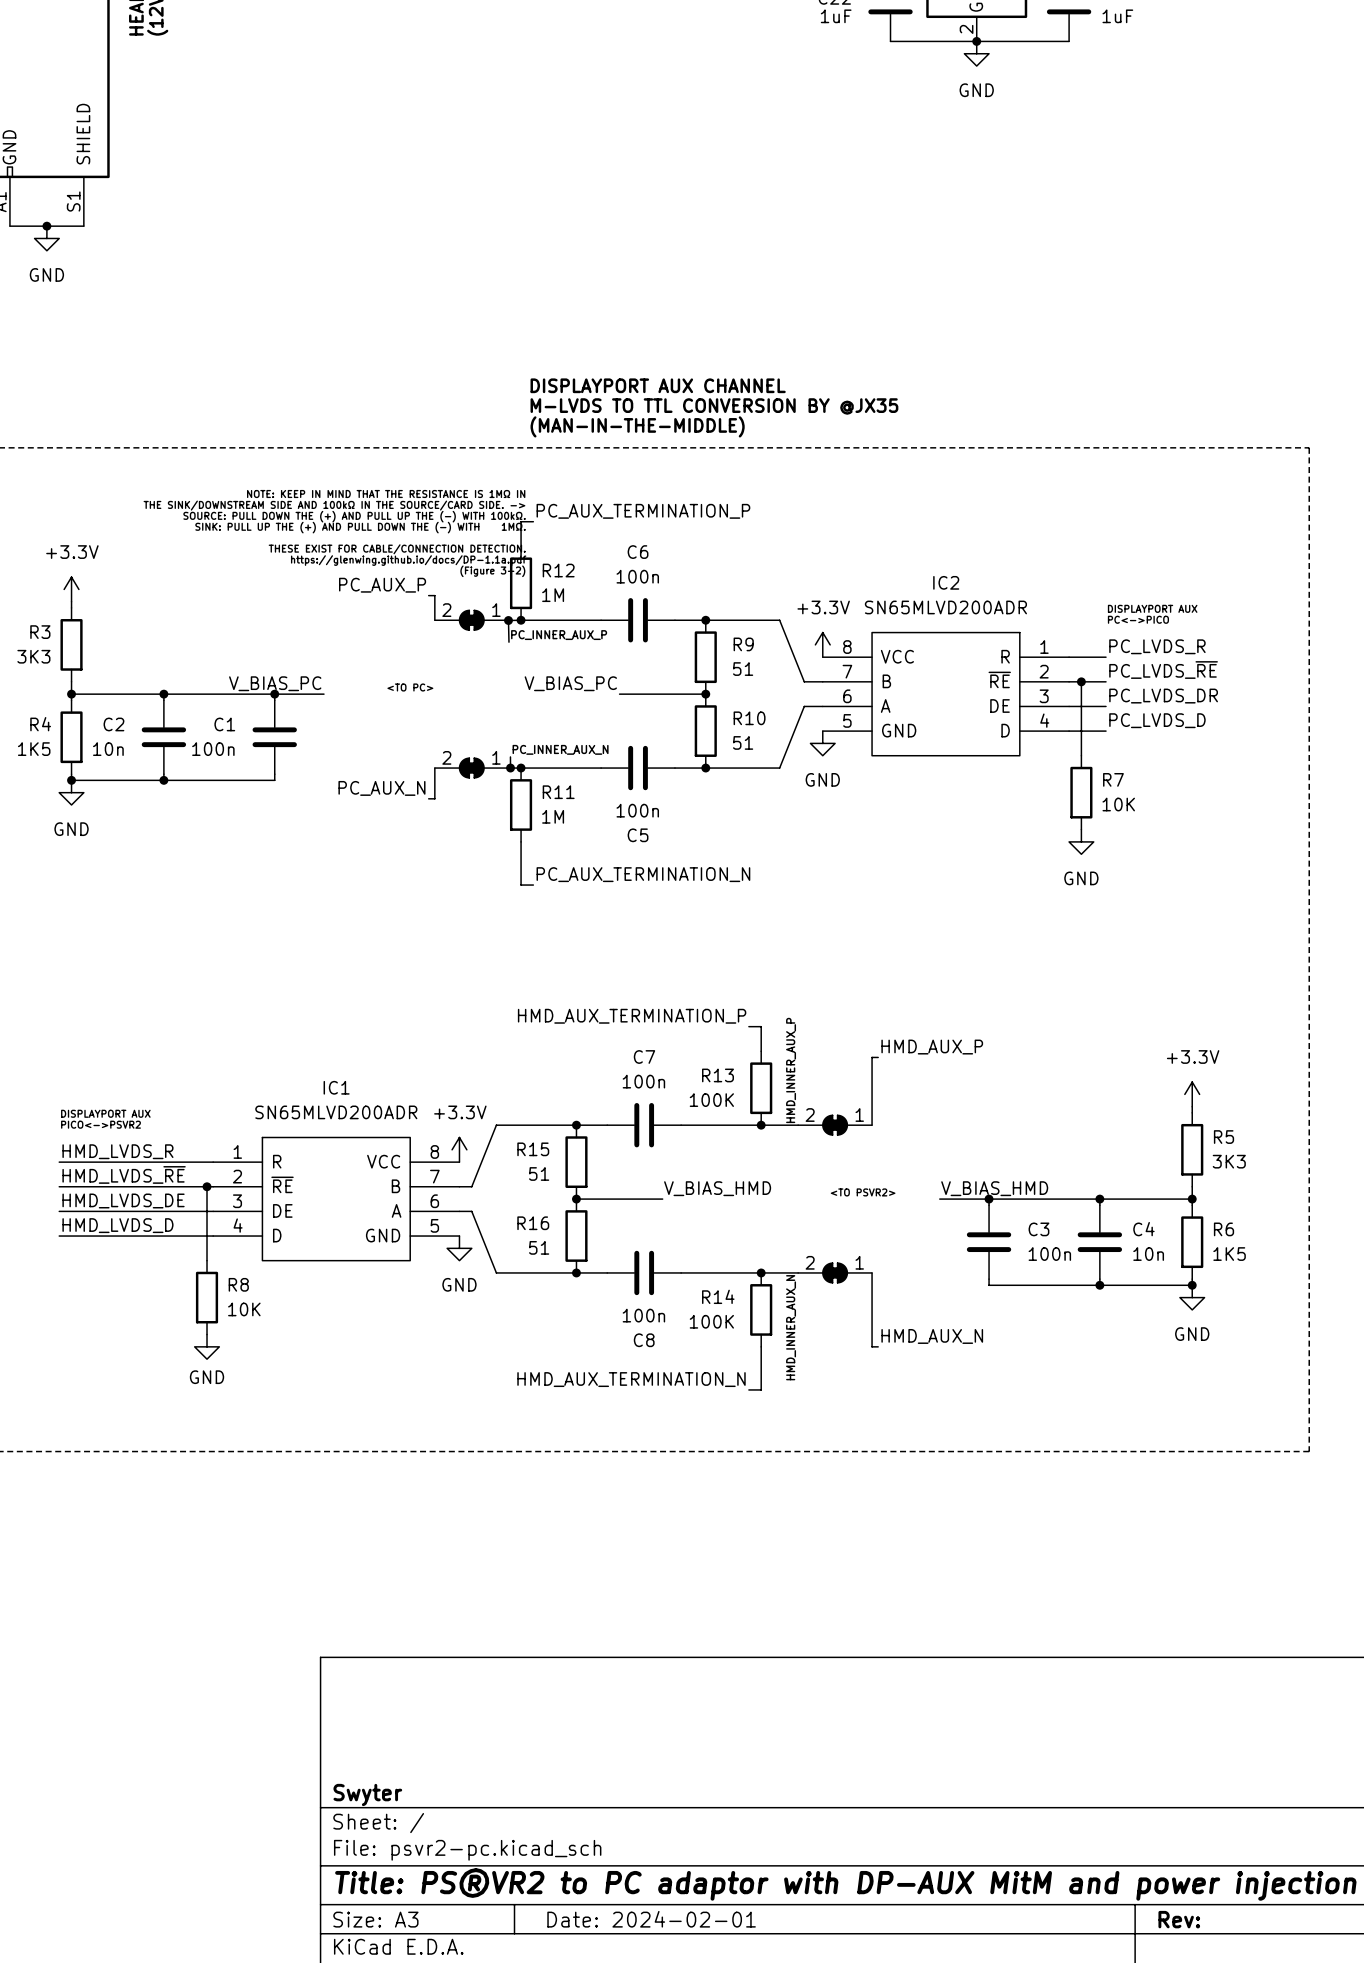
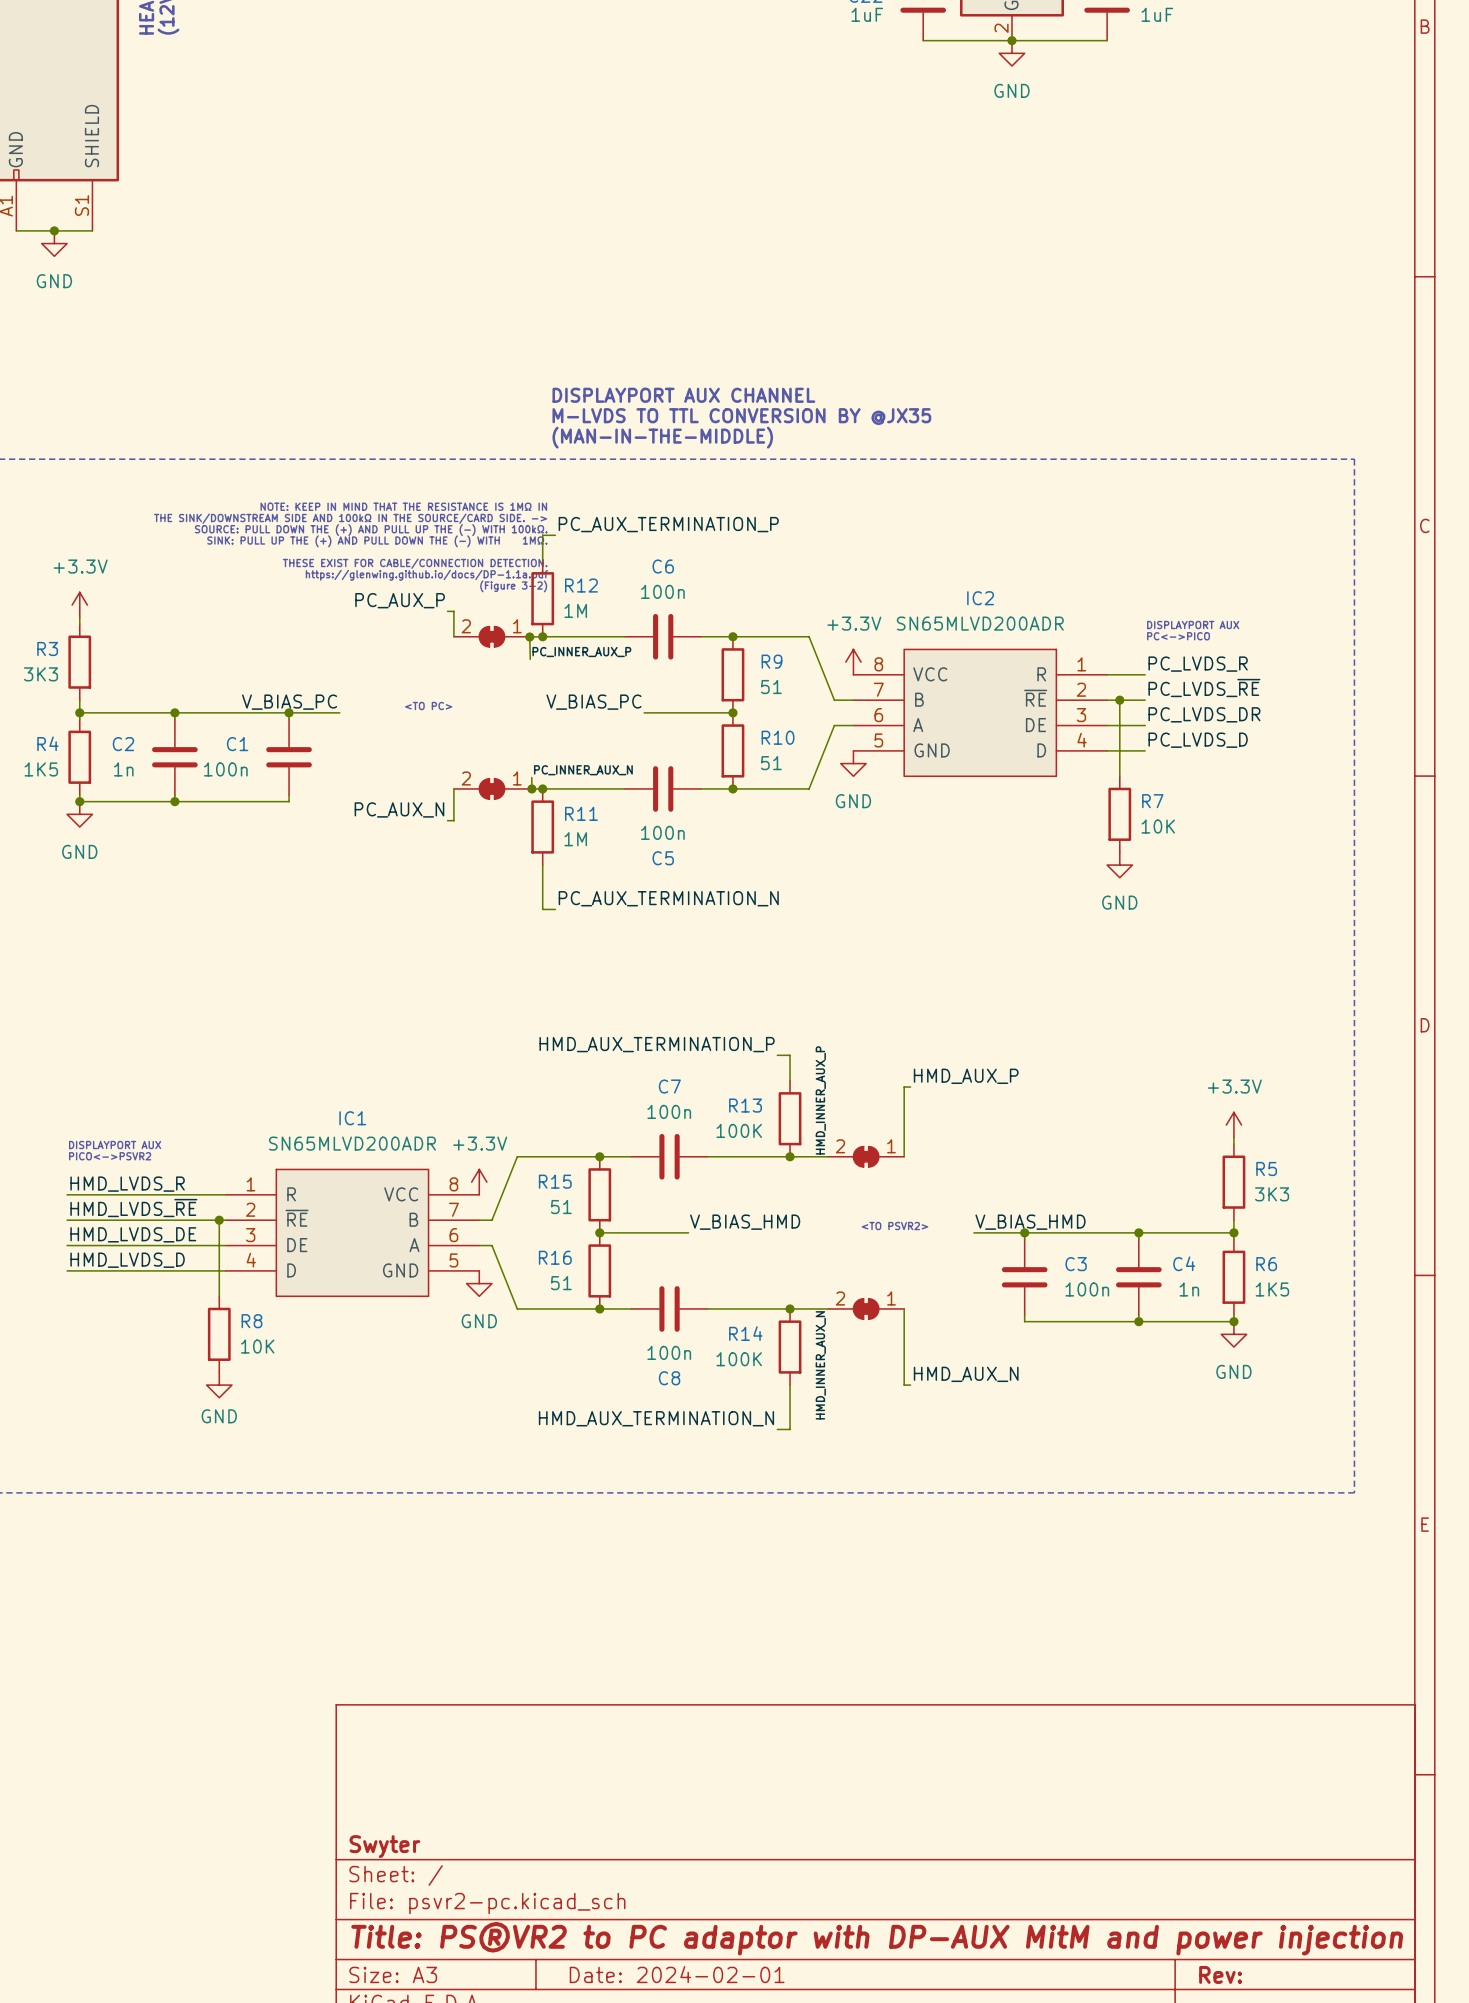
C2 value: 10n (108, 749) -> 1n (123, 769)
C4 value: 10n (1148, 1254) -> 1n (1189, 1289)

